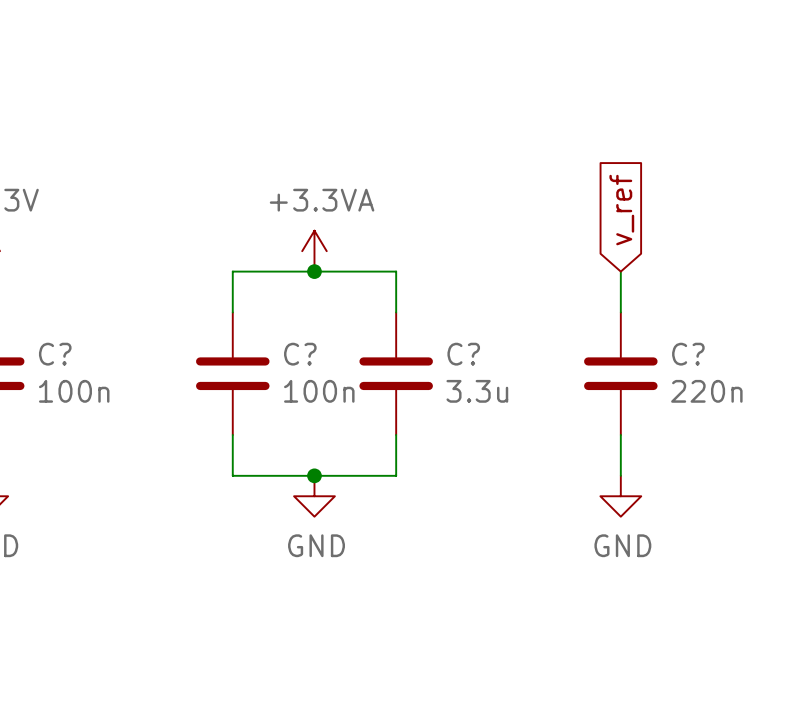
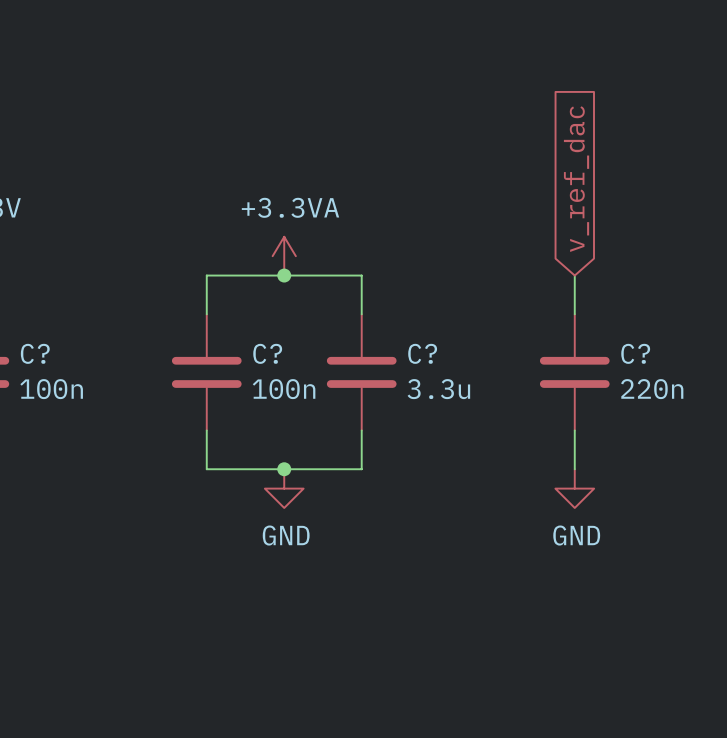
global label: v_ref (621, 210) -> v_ref_dac (576, 179)

